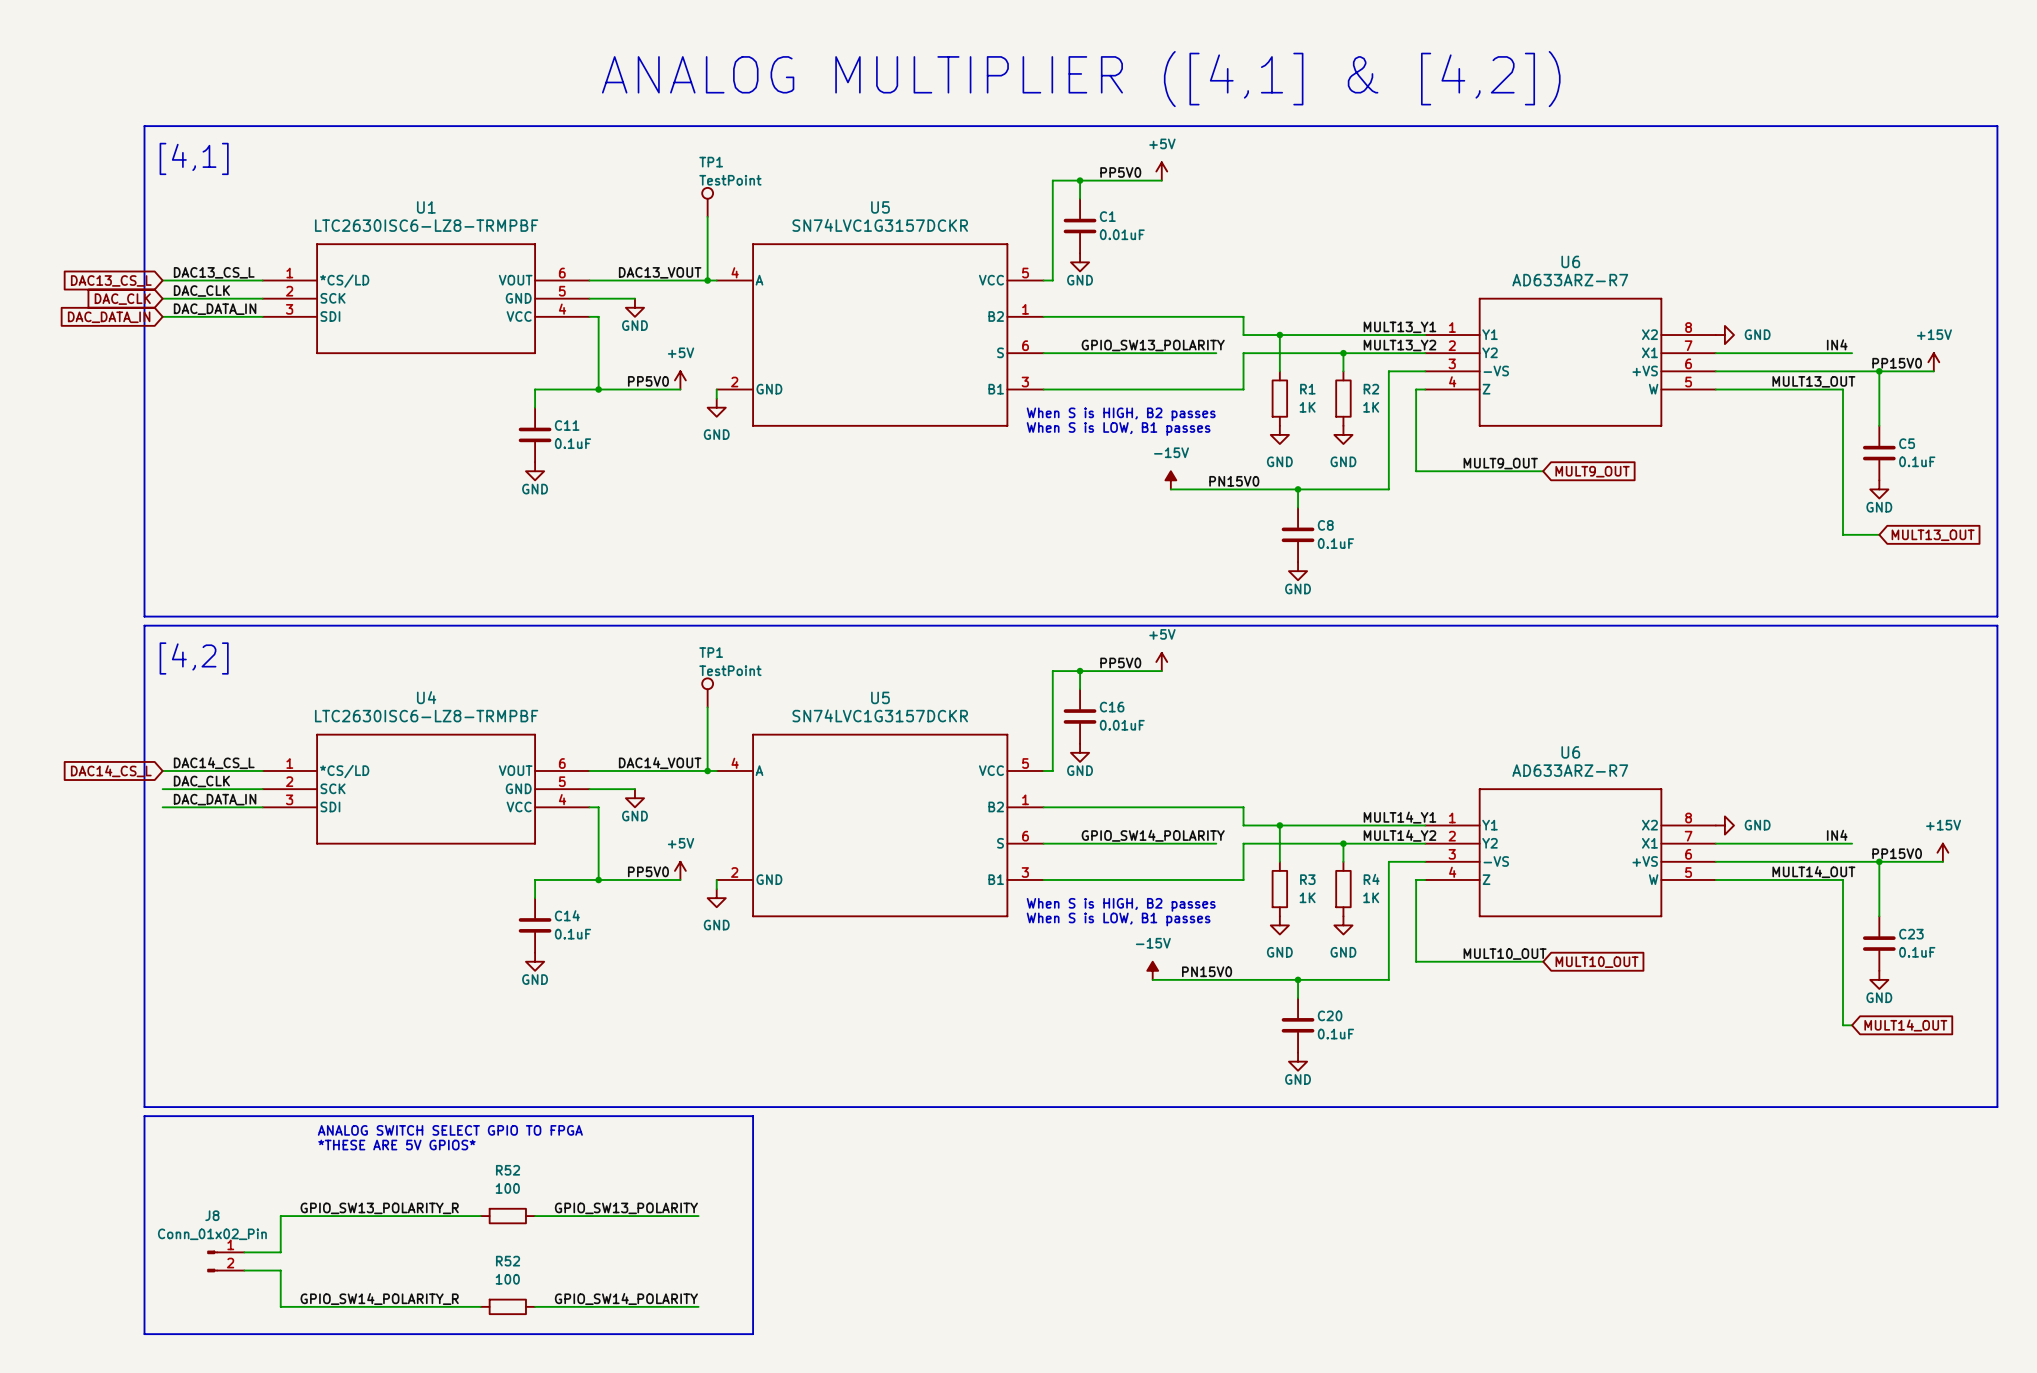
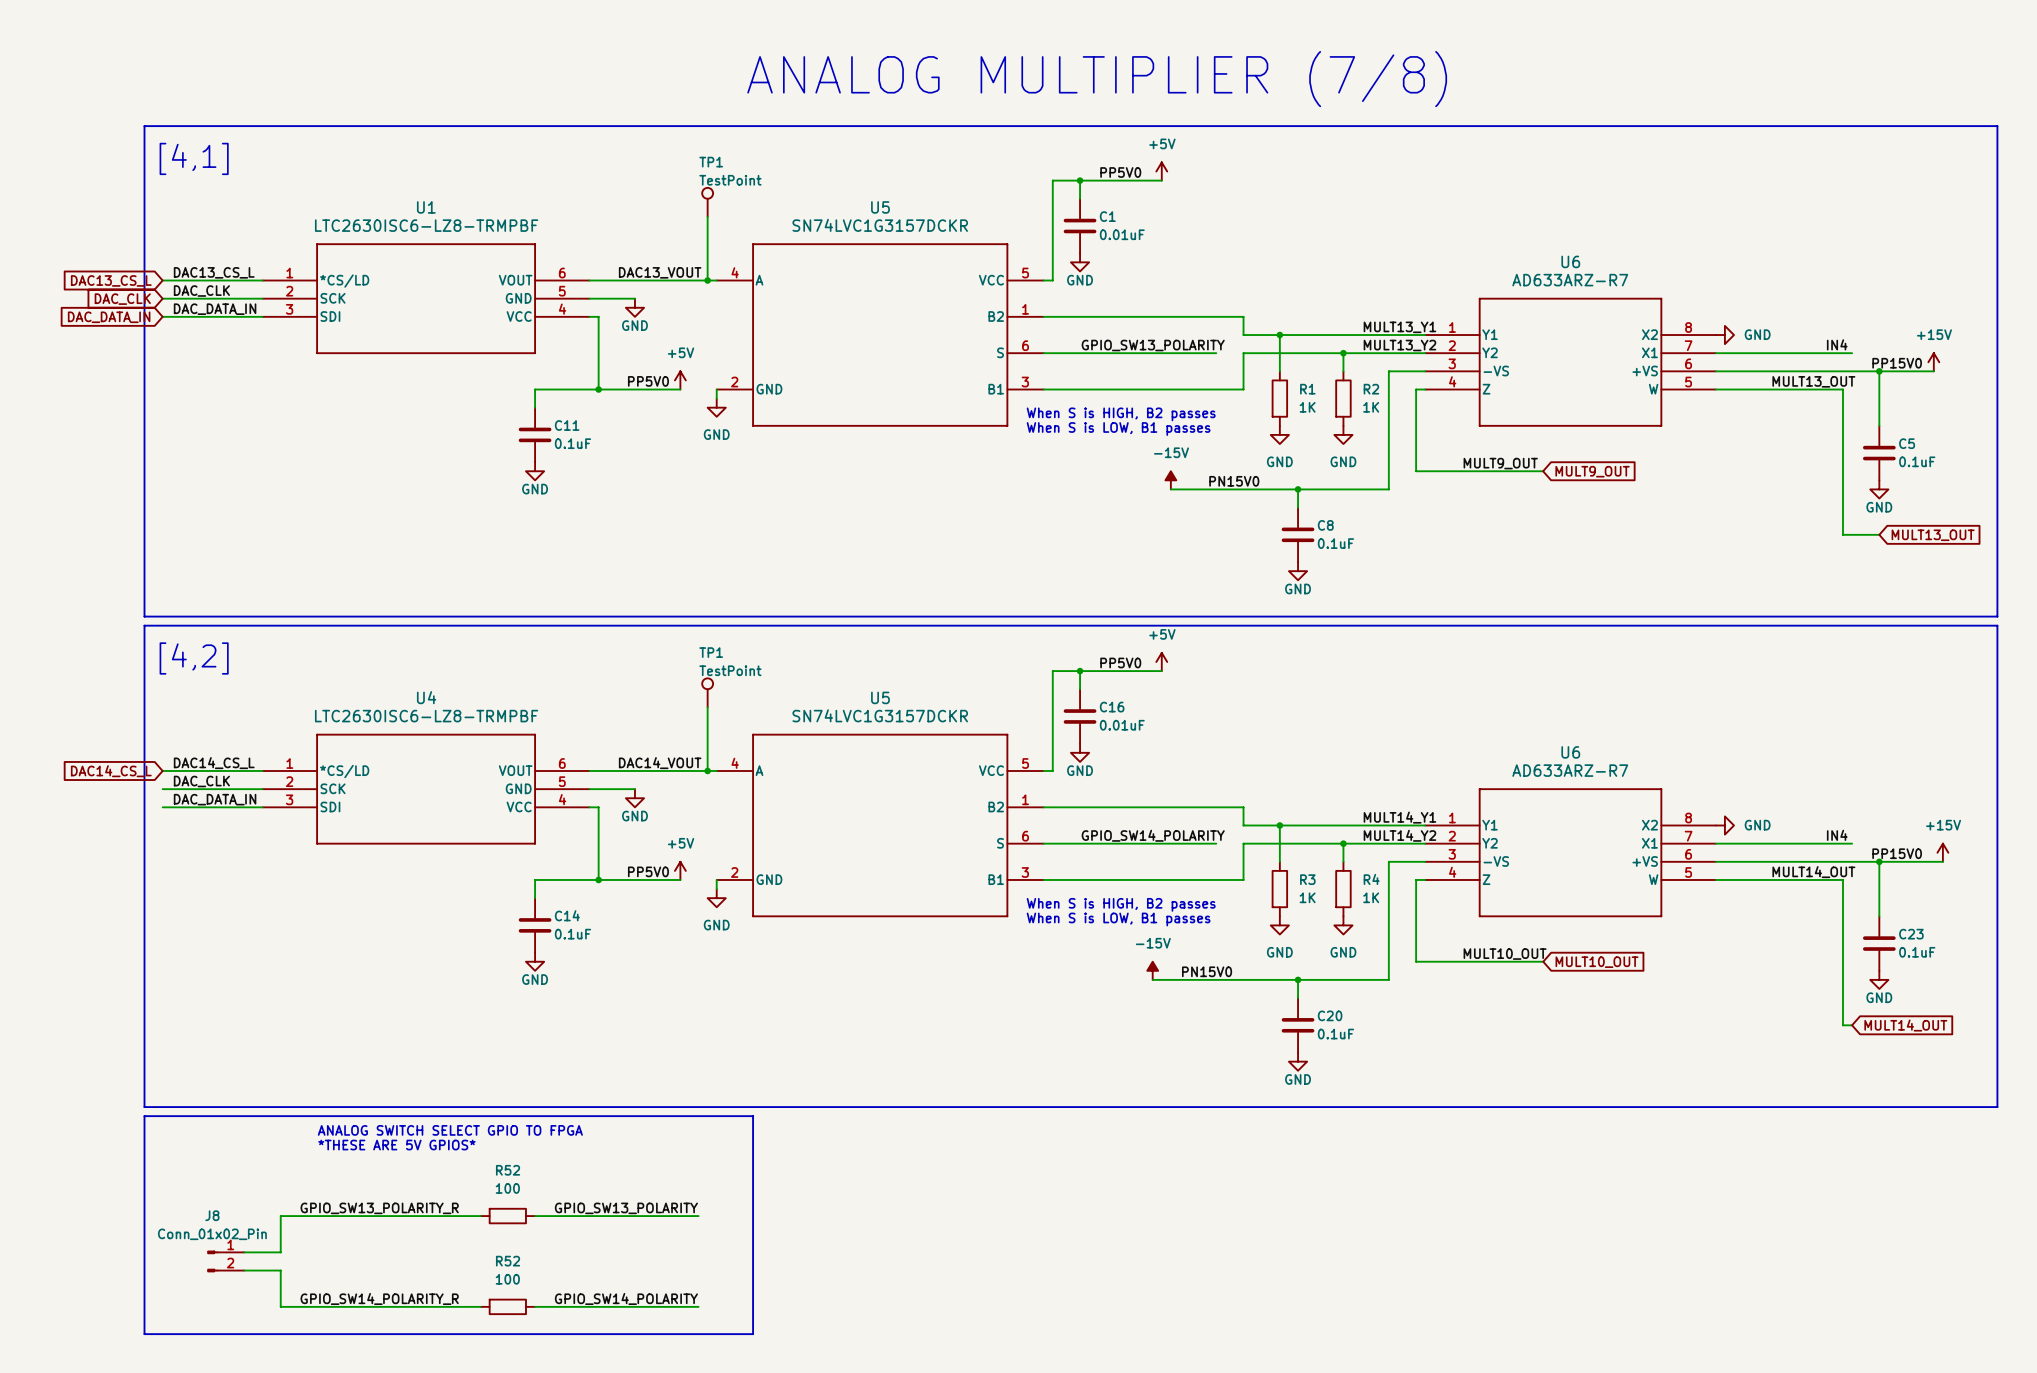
text: ANALOG MULTIPLIER ([4,1] & [4,2]) (1081, 79) -> ANALOG MULTIPLIER (7/8) (1097, 79)

